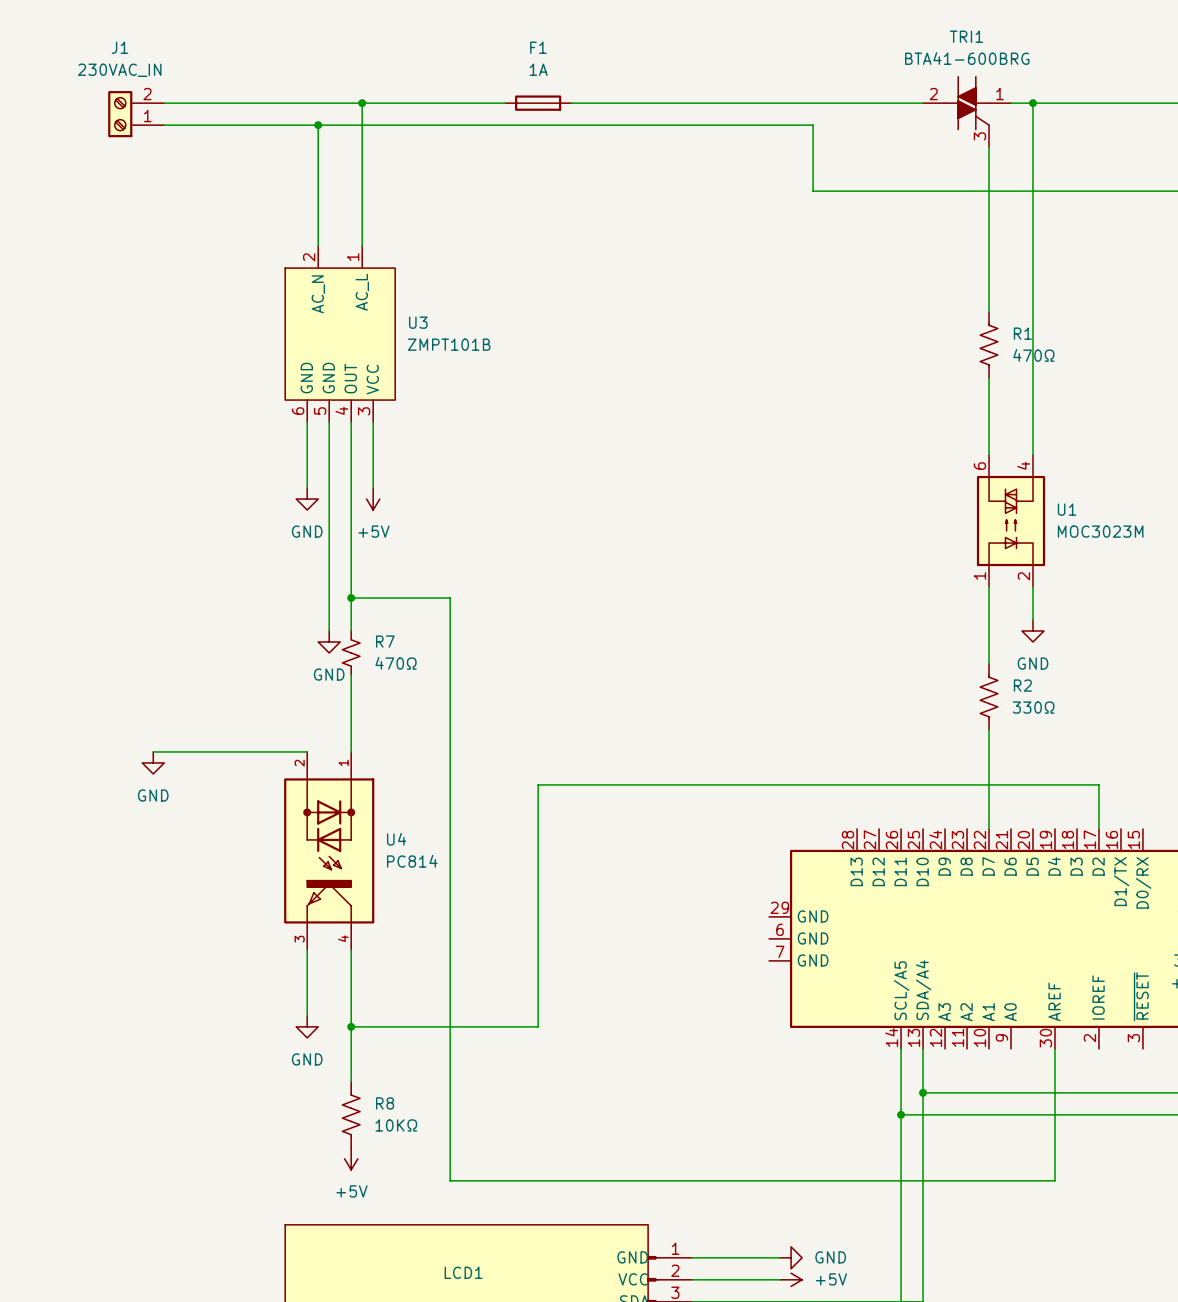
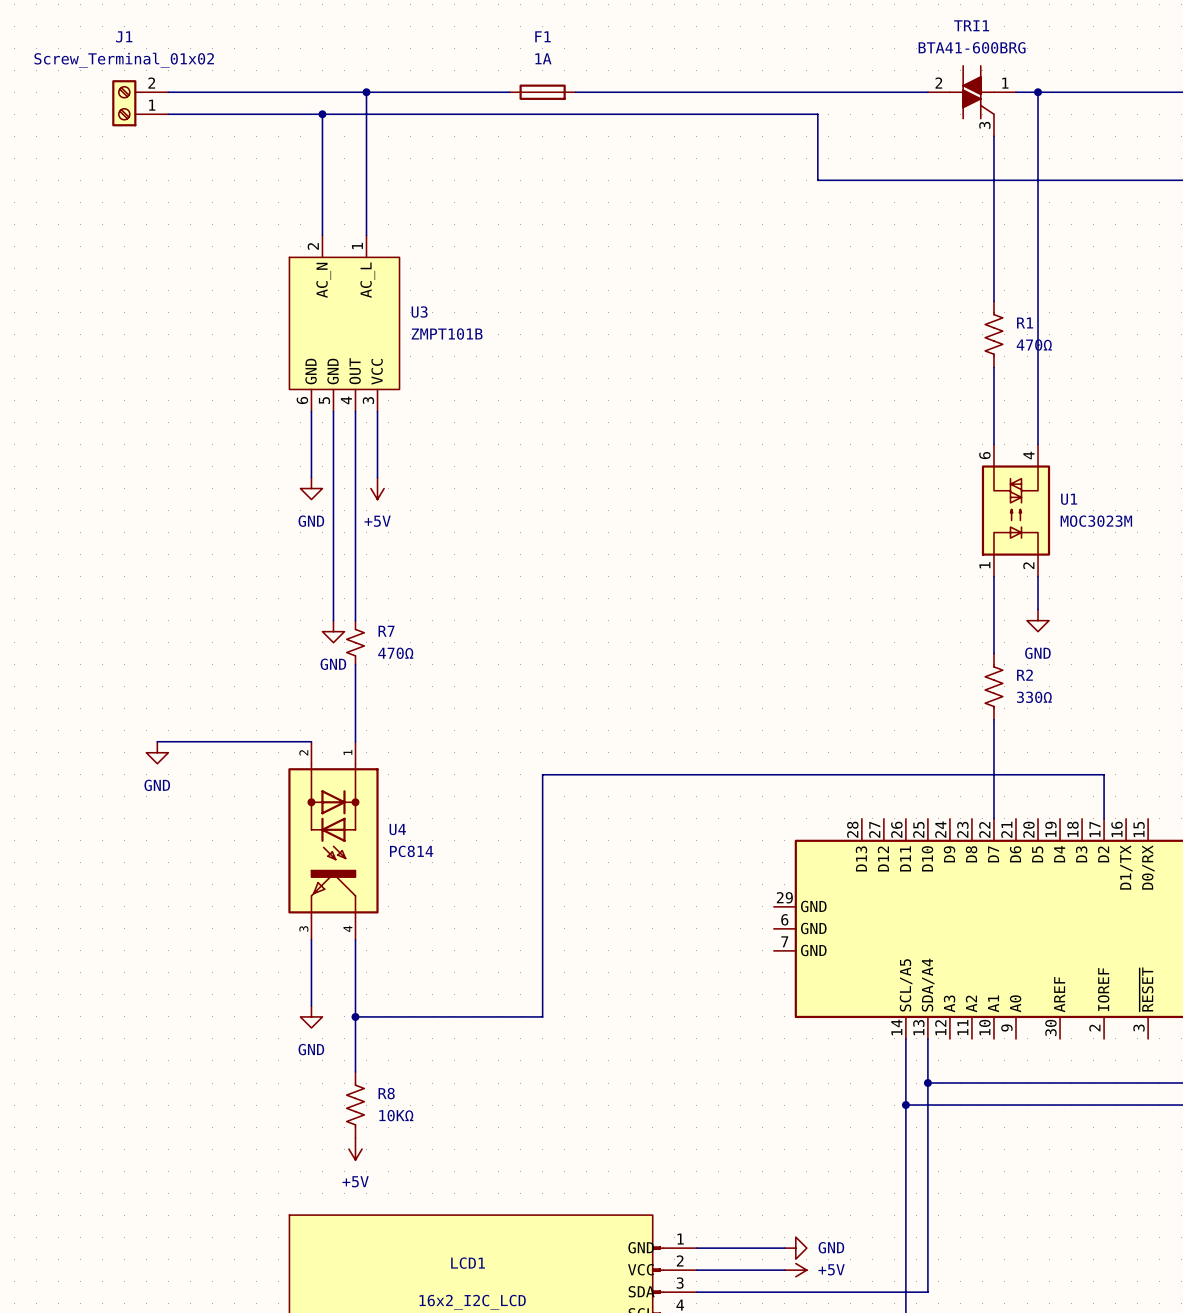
J1 value: 230VAC_IN (119, 70) -> Screw_Terminal_01x02 (124, 60)
wire: (351, 598) (450, 598) (450, 1180) (1054, 1180) (1054, 1048) -> none
junction: (351, 598) -> none

